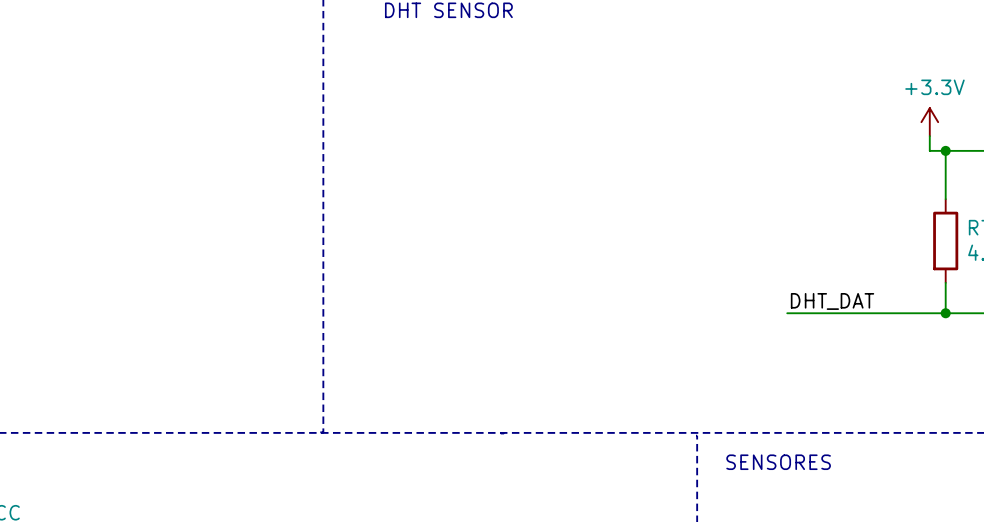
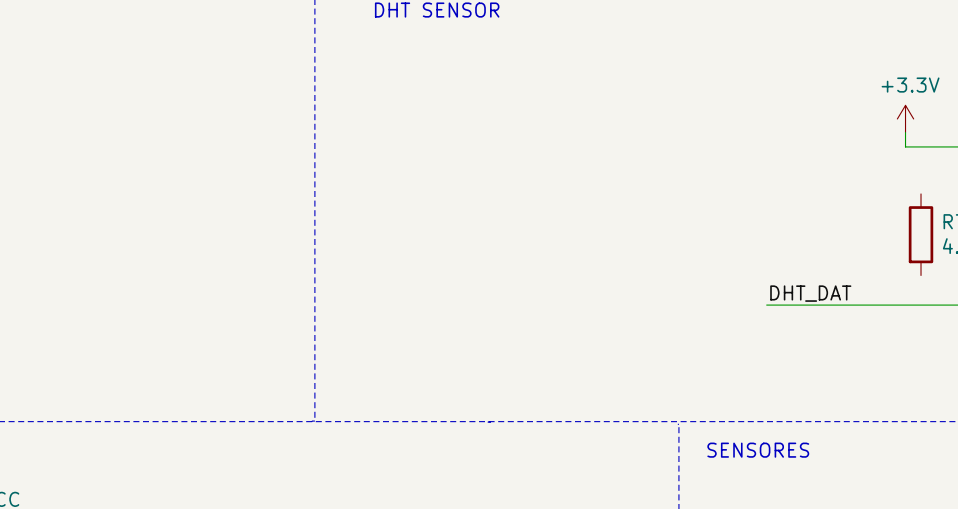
wire: (945, 150) (945, 199) -> none
junction: (945, 150) -> none
wire: (945, 282) (945, 313) -> none
junction: (945, 313) -> none

